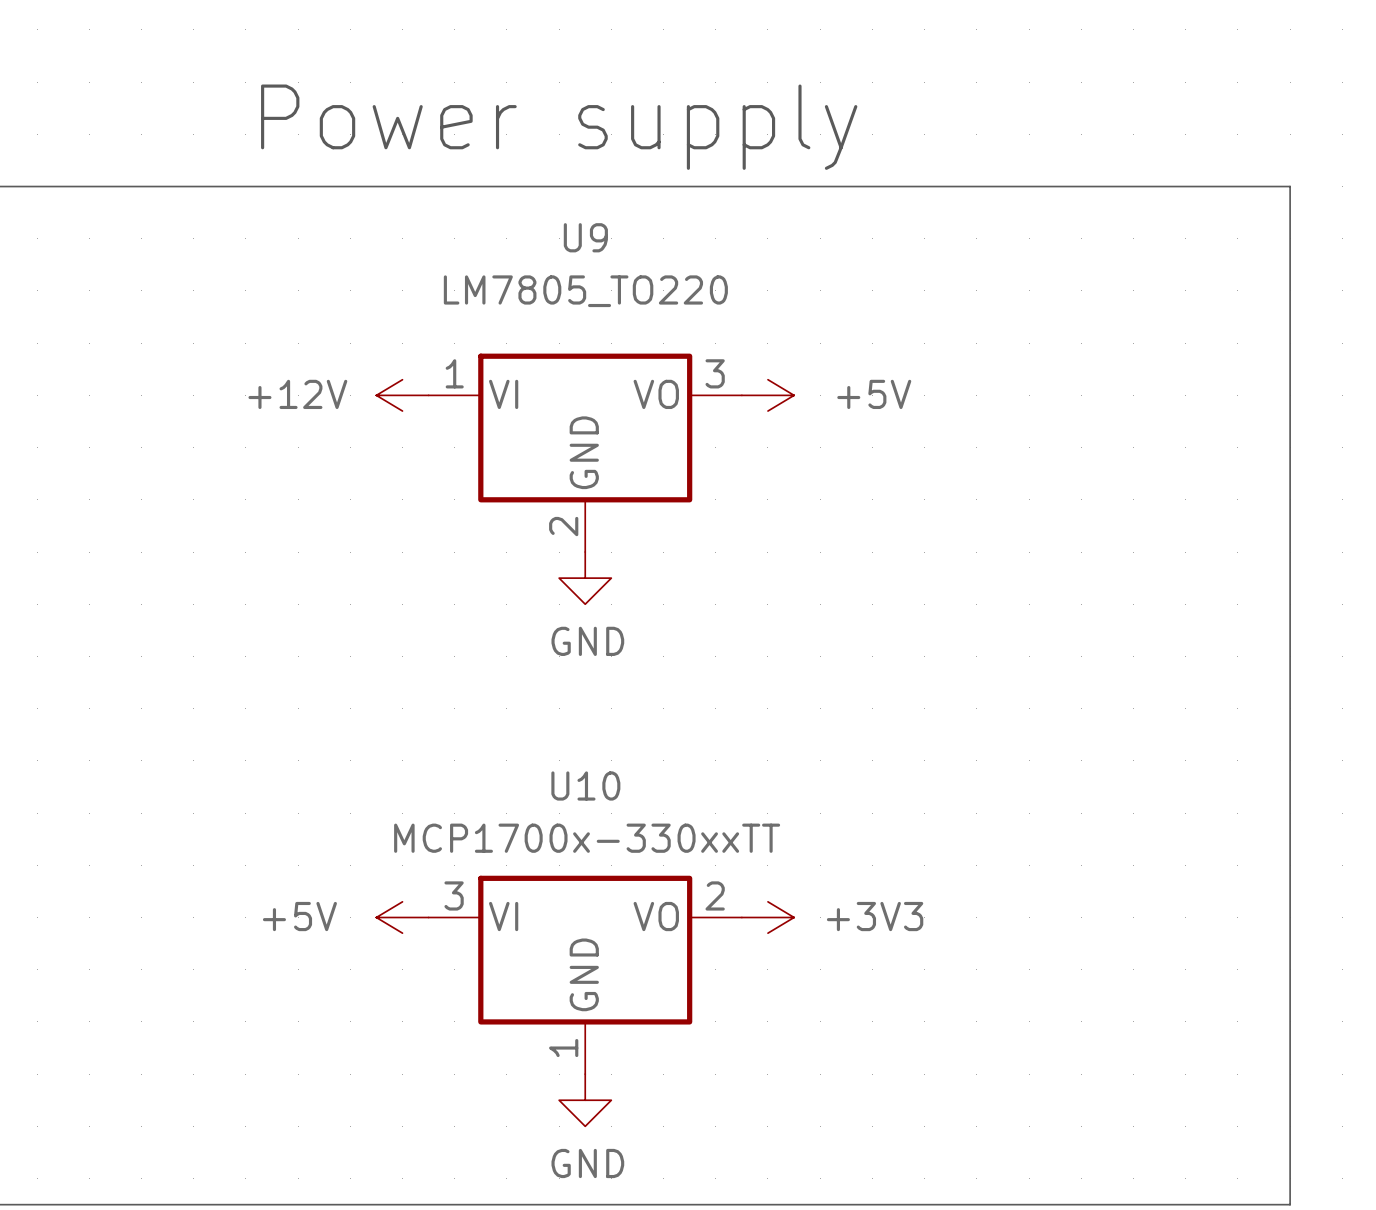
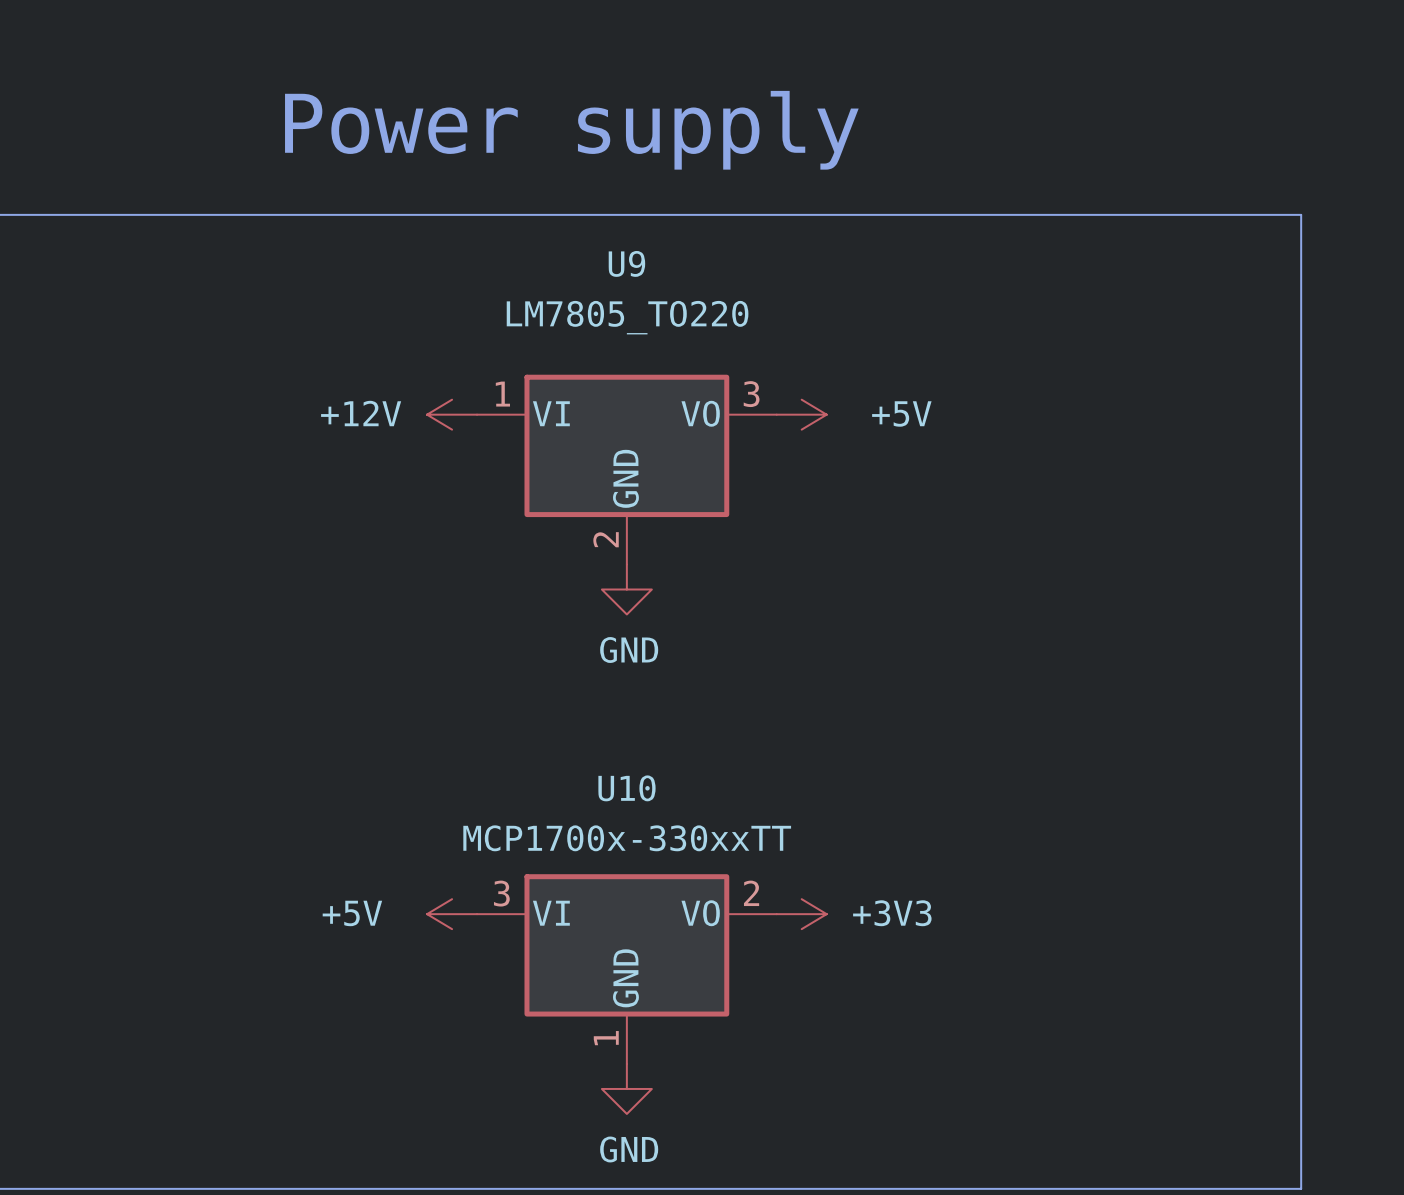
text position: Power supply (559, 127) -> Power supply (571, 130)

